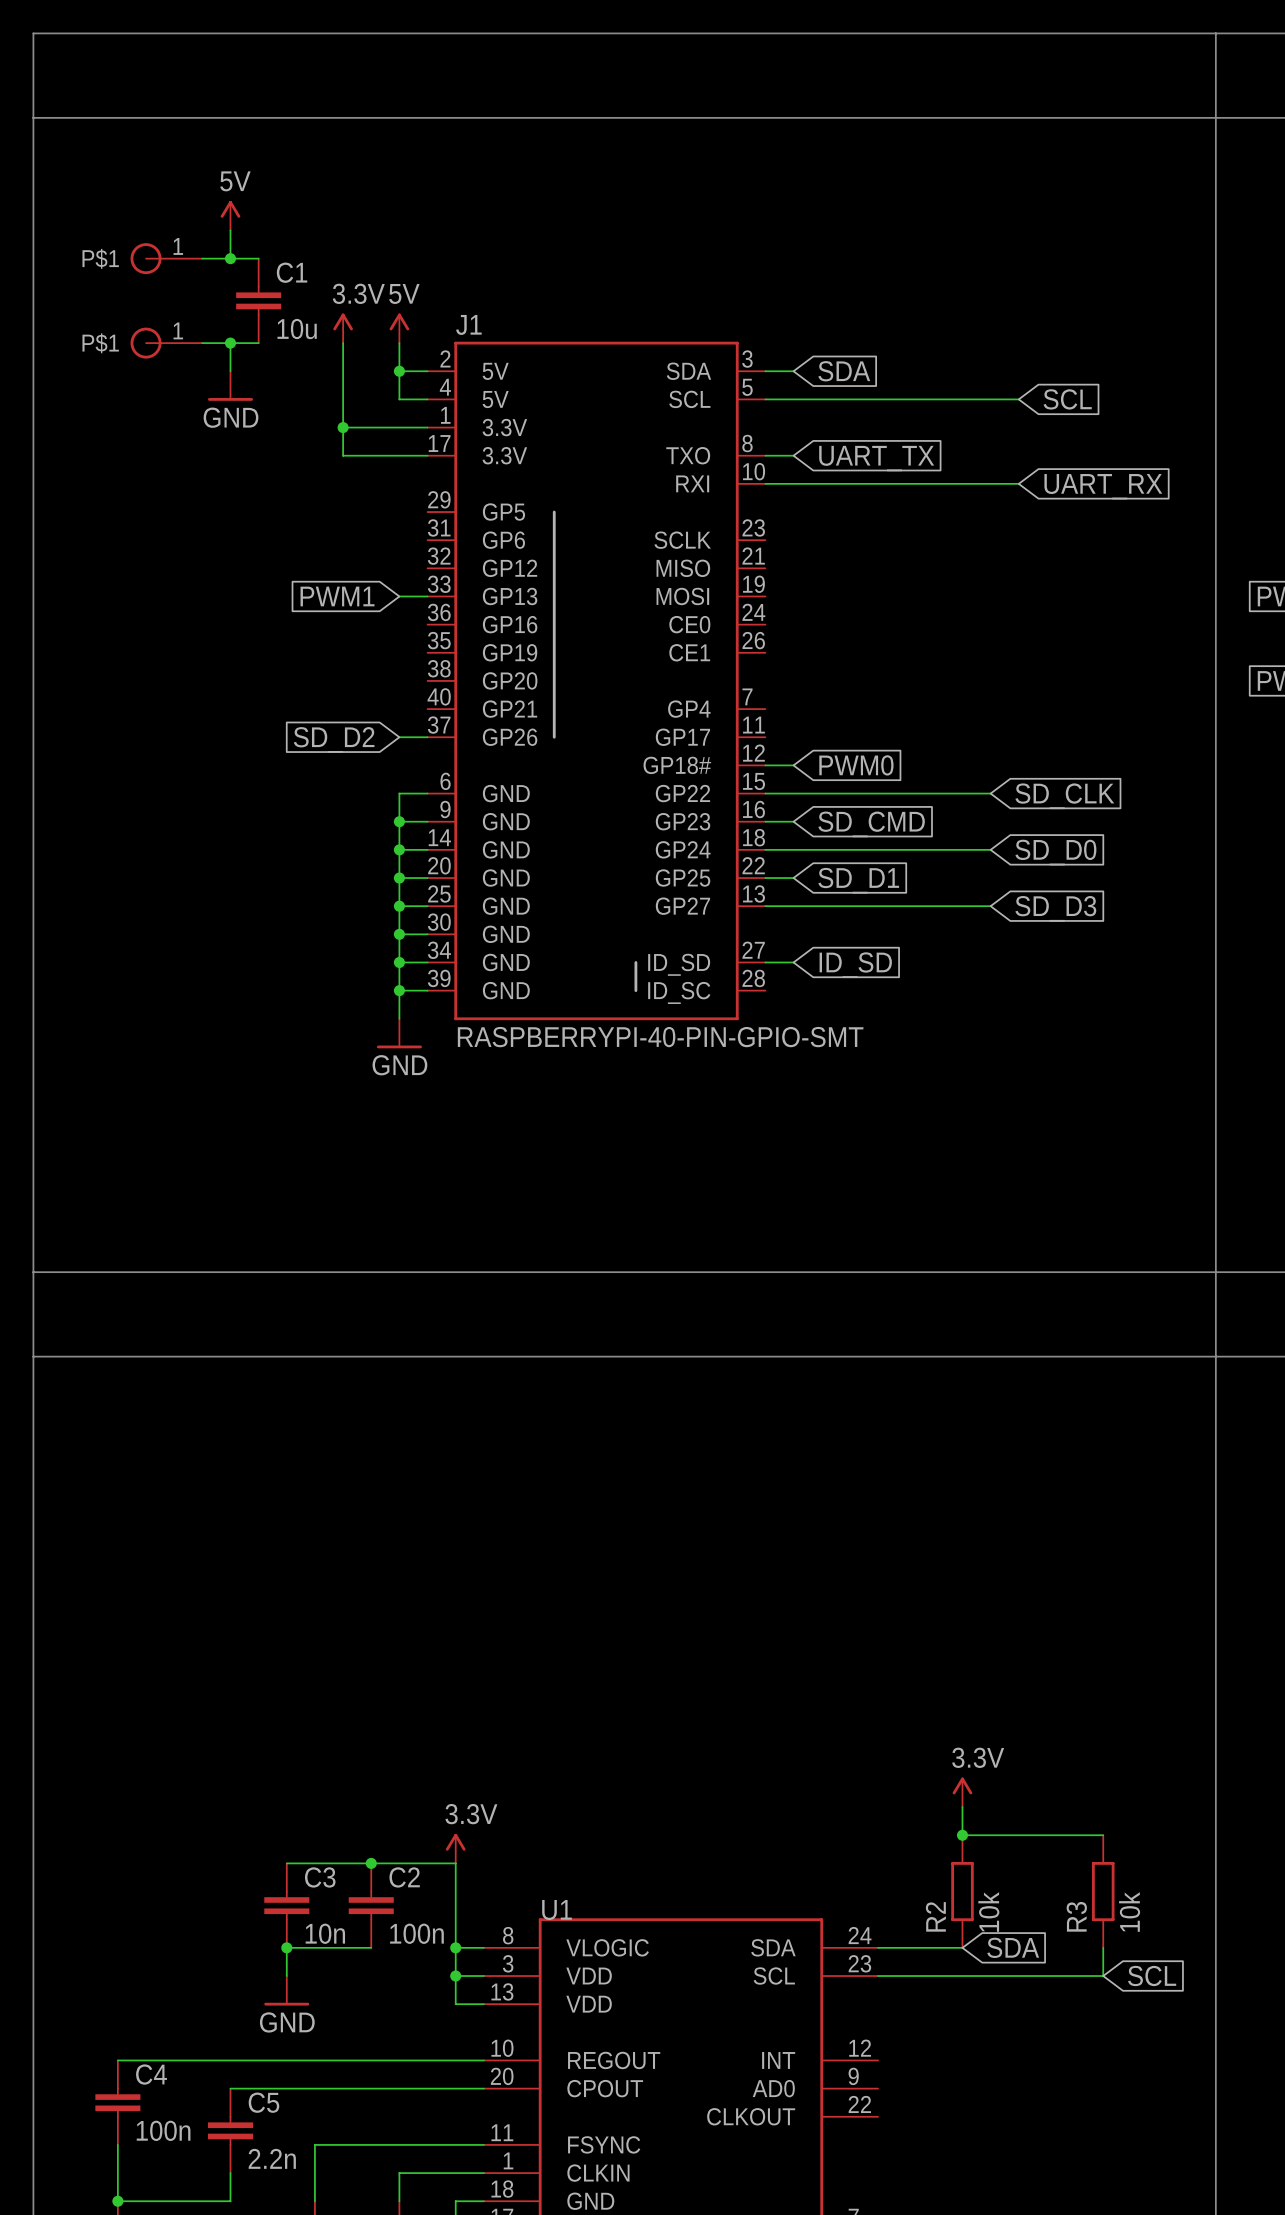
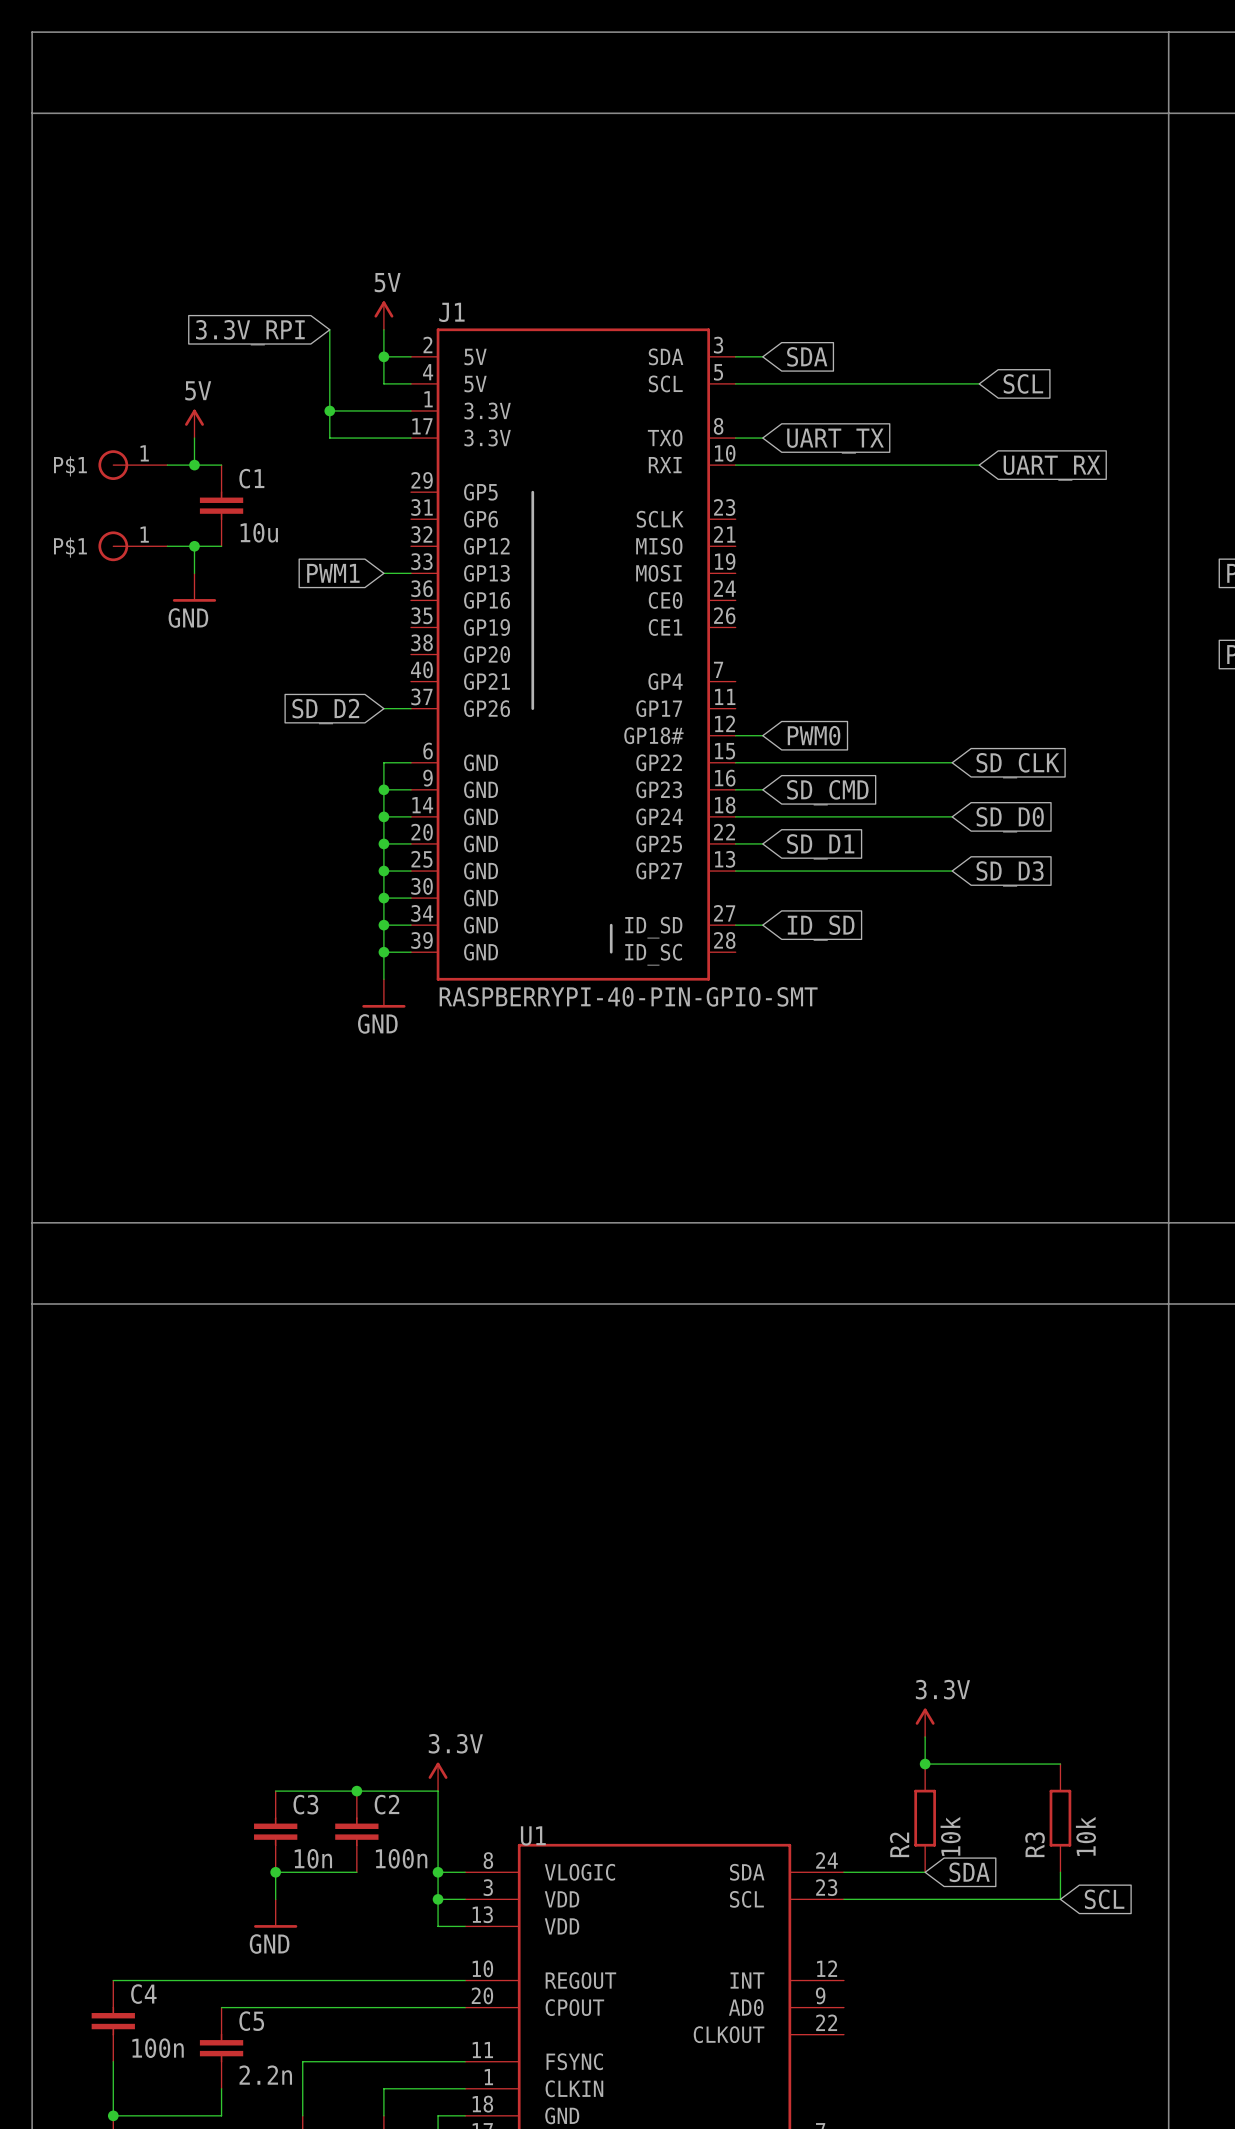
power symbol position: 5V (230, 215) -> 5V (194, 423)
wire: (230, 230) (230, 258) -> (194, 438) (194, 465)
part: (166, 258) -> none
wire: (202, 258) (258, 258) -> (167, 465) (221, 465)
junction: (230, 258) -> none
C1 position: (258, 300) -> (221, 505)
power symbol: 3.3V (343, 328) -> none
part: (166, 343) -> none
wire: (202, 343) (258, 343) -> (167, 546) (221, 546)
wire: (230, 343) (230, 371) -> (194, 546) (194, 573)
junction: (230, 343) -> none
global label: none -> 3.3V_RPI (250, 332)
power symbol position: GND (230, 386) -> GND (194, 587)
part: none -> (132, 465)
junction: none -> (194, 465)
part: none -> (132, 546)
junction: none -> (194, 546)

